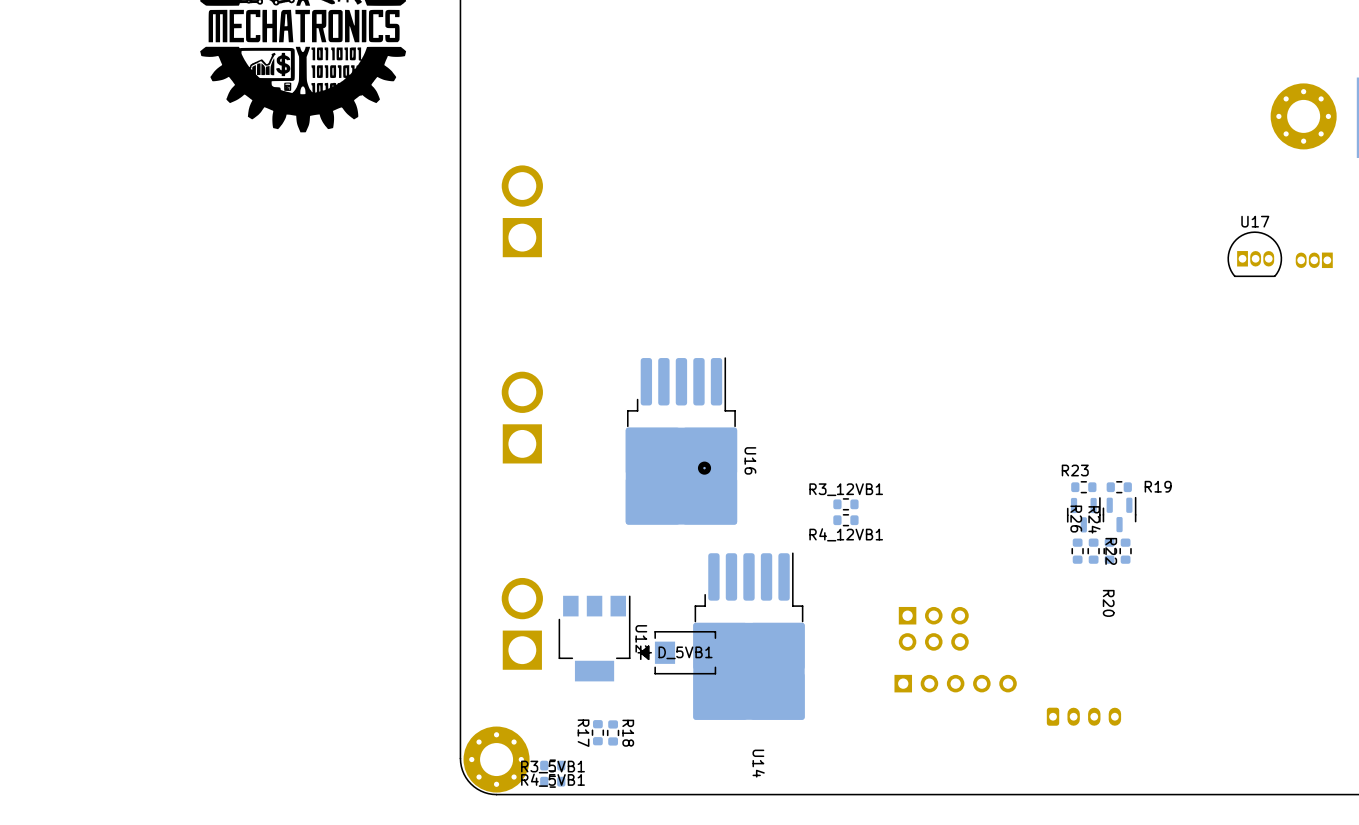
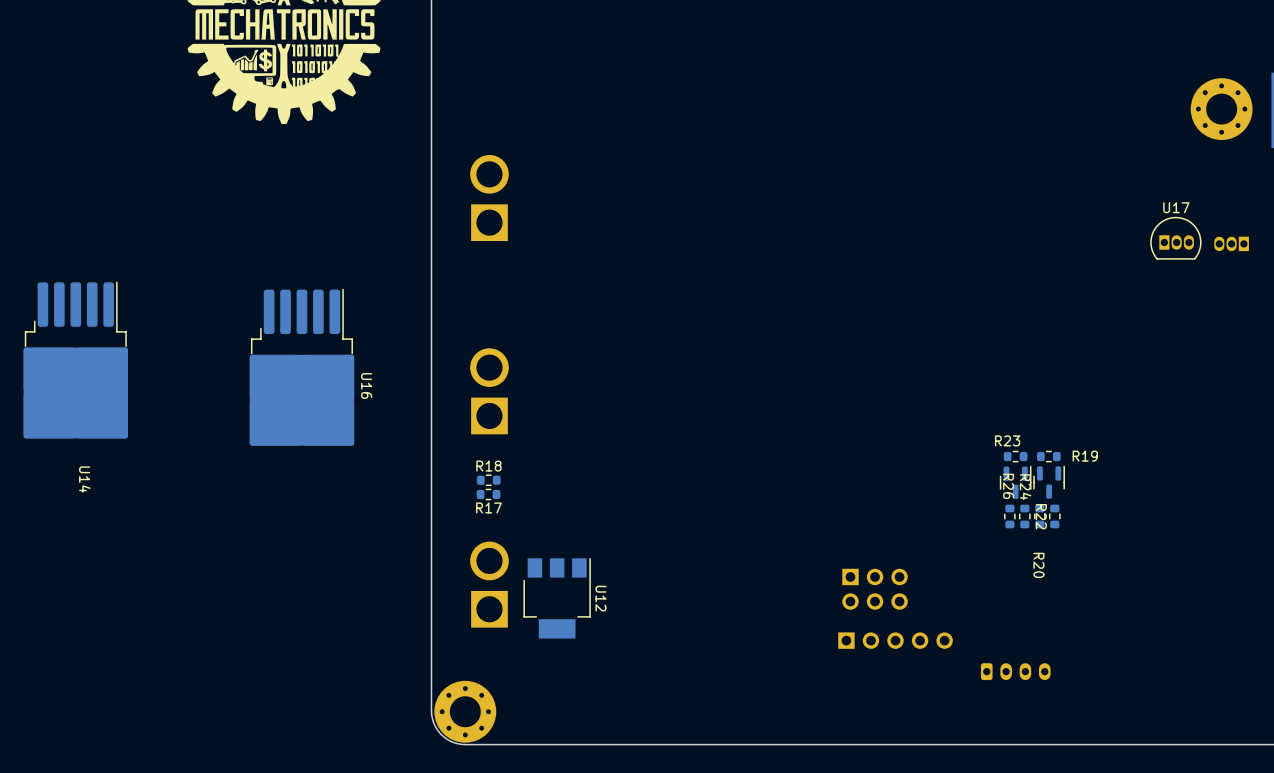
U16 position: (681, 441) -> (301, 367)
part: (704, 468) -> none
R3_12VB1: (845, 504) -> none
R4_12VB1: (845, 520) -> none
U14 position: (748, 636) -> (75, 360)
D_5VB1: (676, 652) -> none
R17 rotation: 0° (597, 732) -> 90° clockwise (488, 494)
R17 position: (597, 732) -> (488, 494)
R18 rotation: 0° (613, 732) -> 90° clockwise (488, 480)
R18 position: (613, 732) -> (488, 480)
R17 name position: R17 (583, 733) -> R17 (488, 507)
R18 name position: R18 (628, 733) -> R18 (488, 466)
R4_5VB1: (552, 765) -> none
R3_5VB1: (552, 781) -> none

